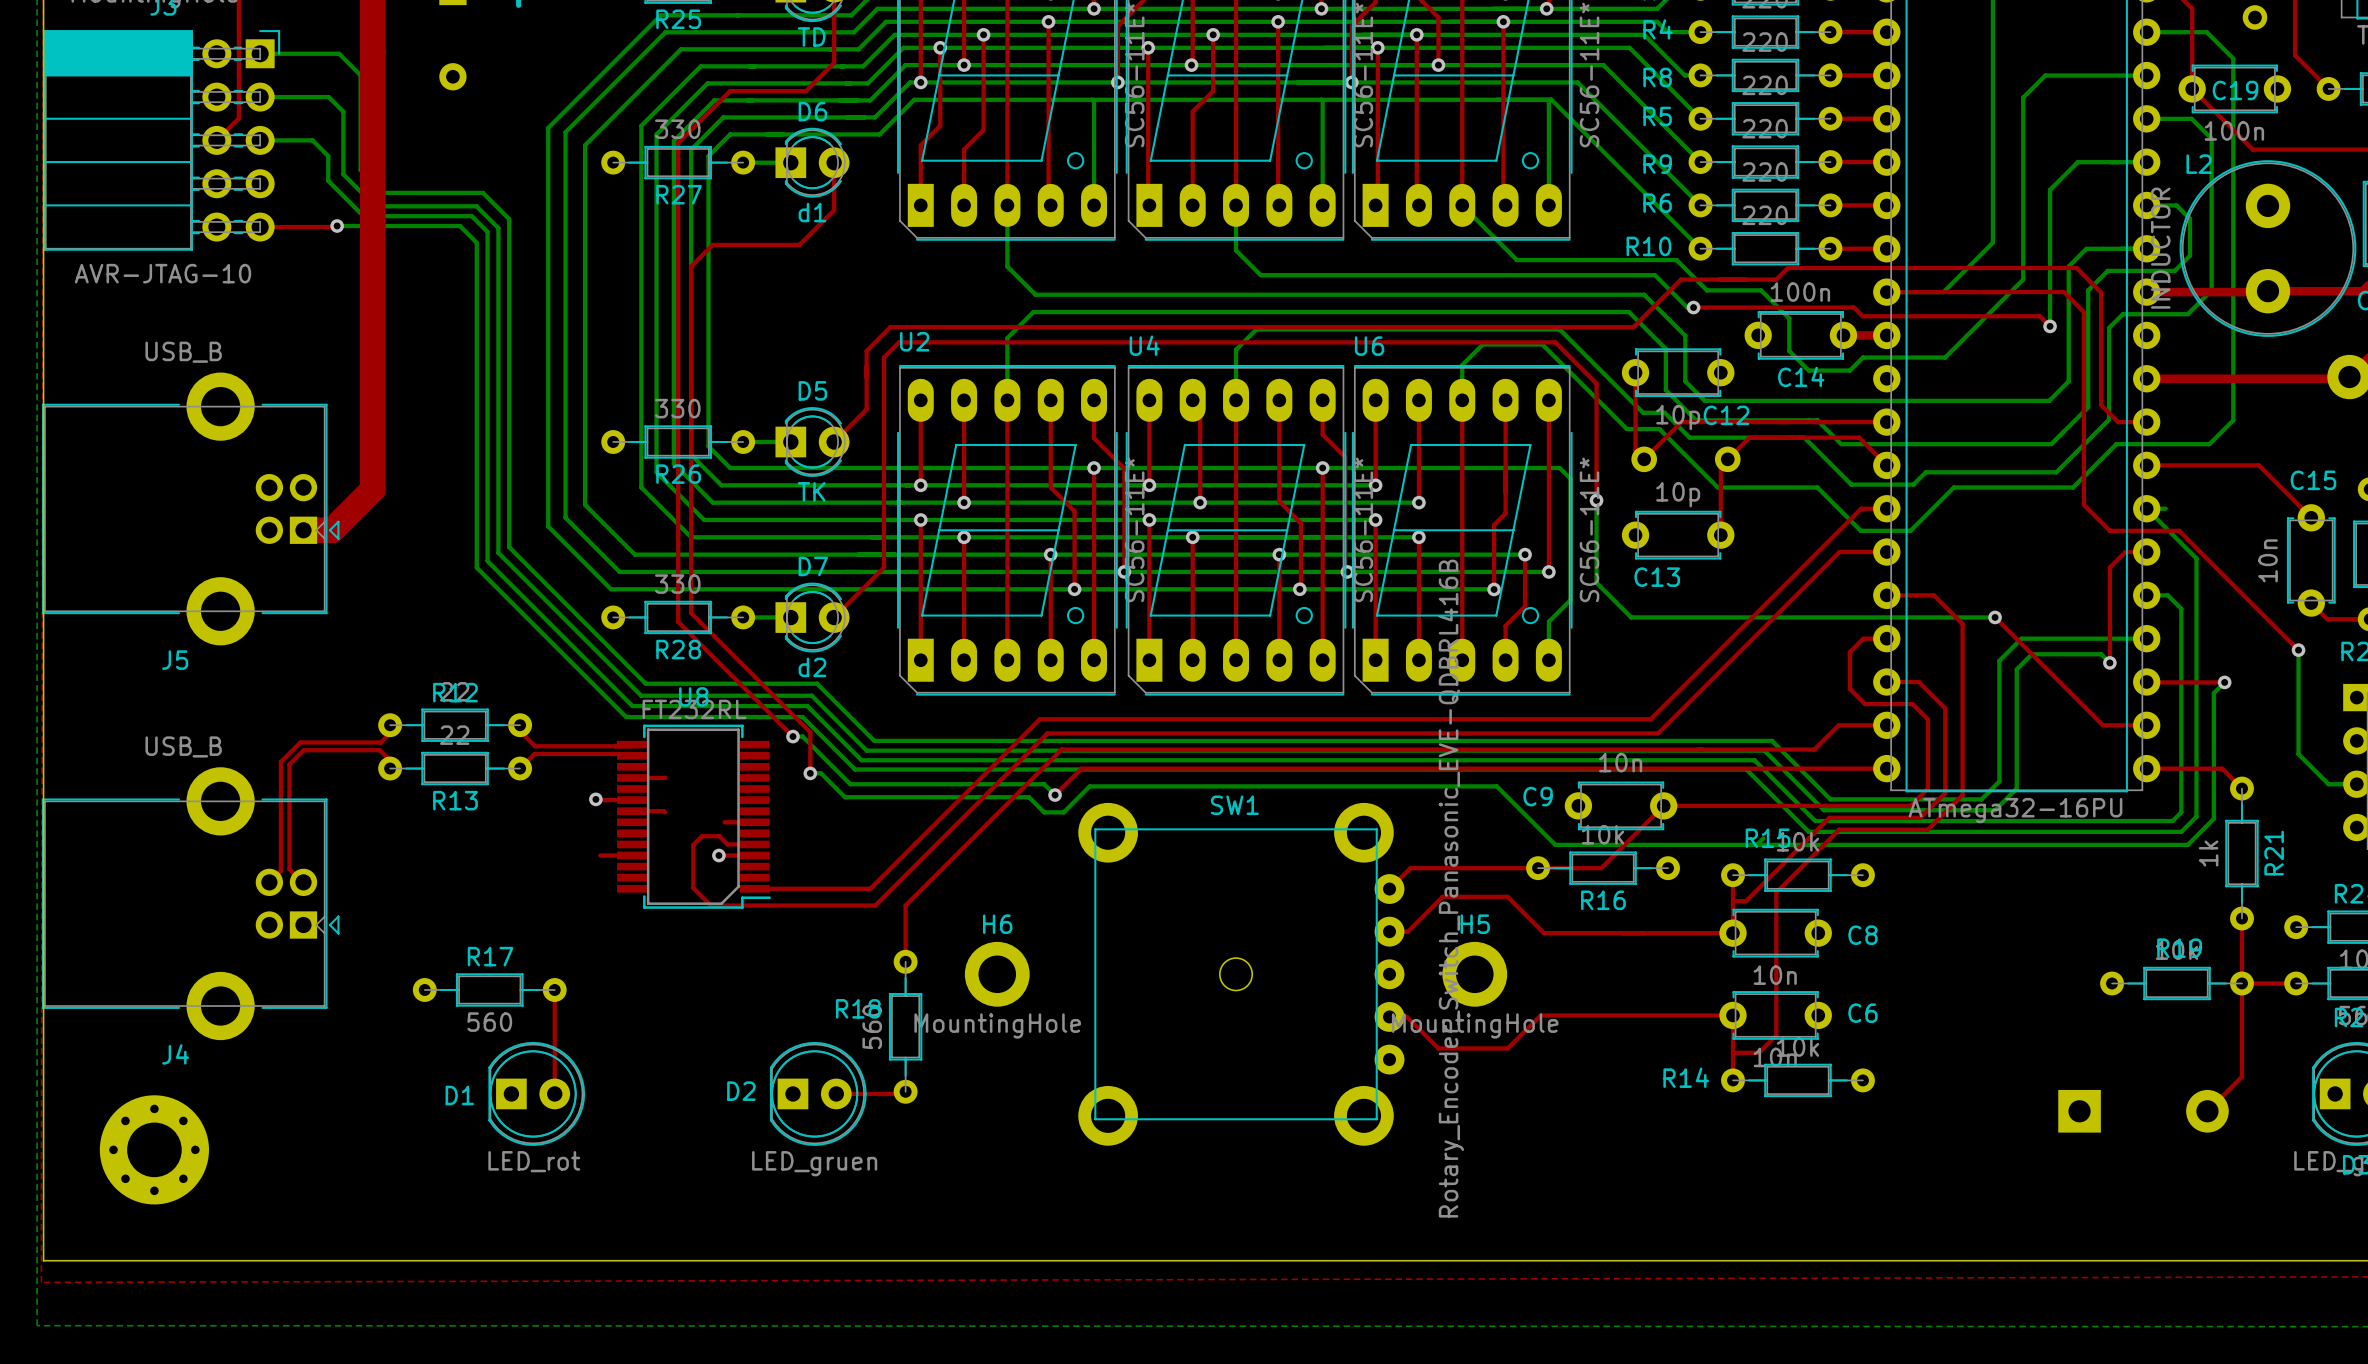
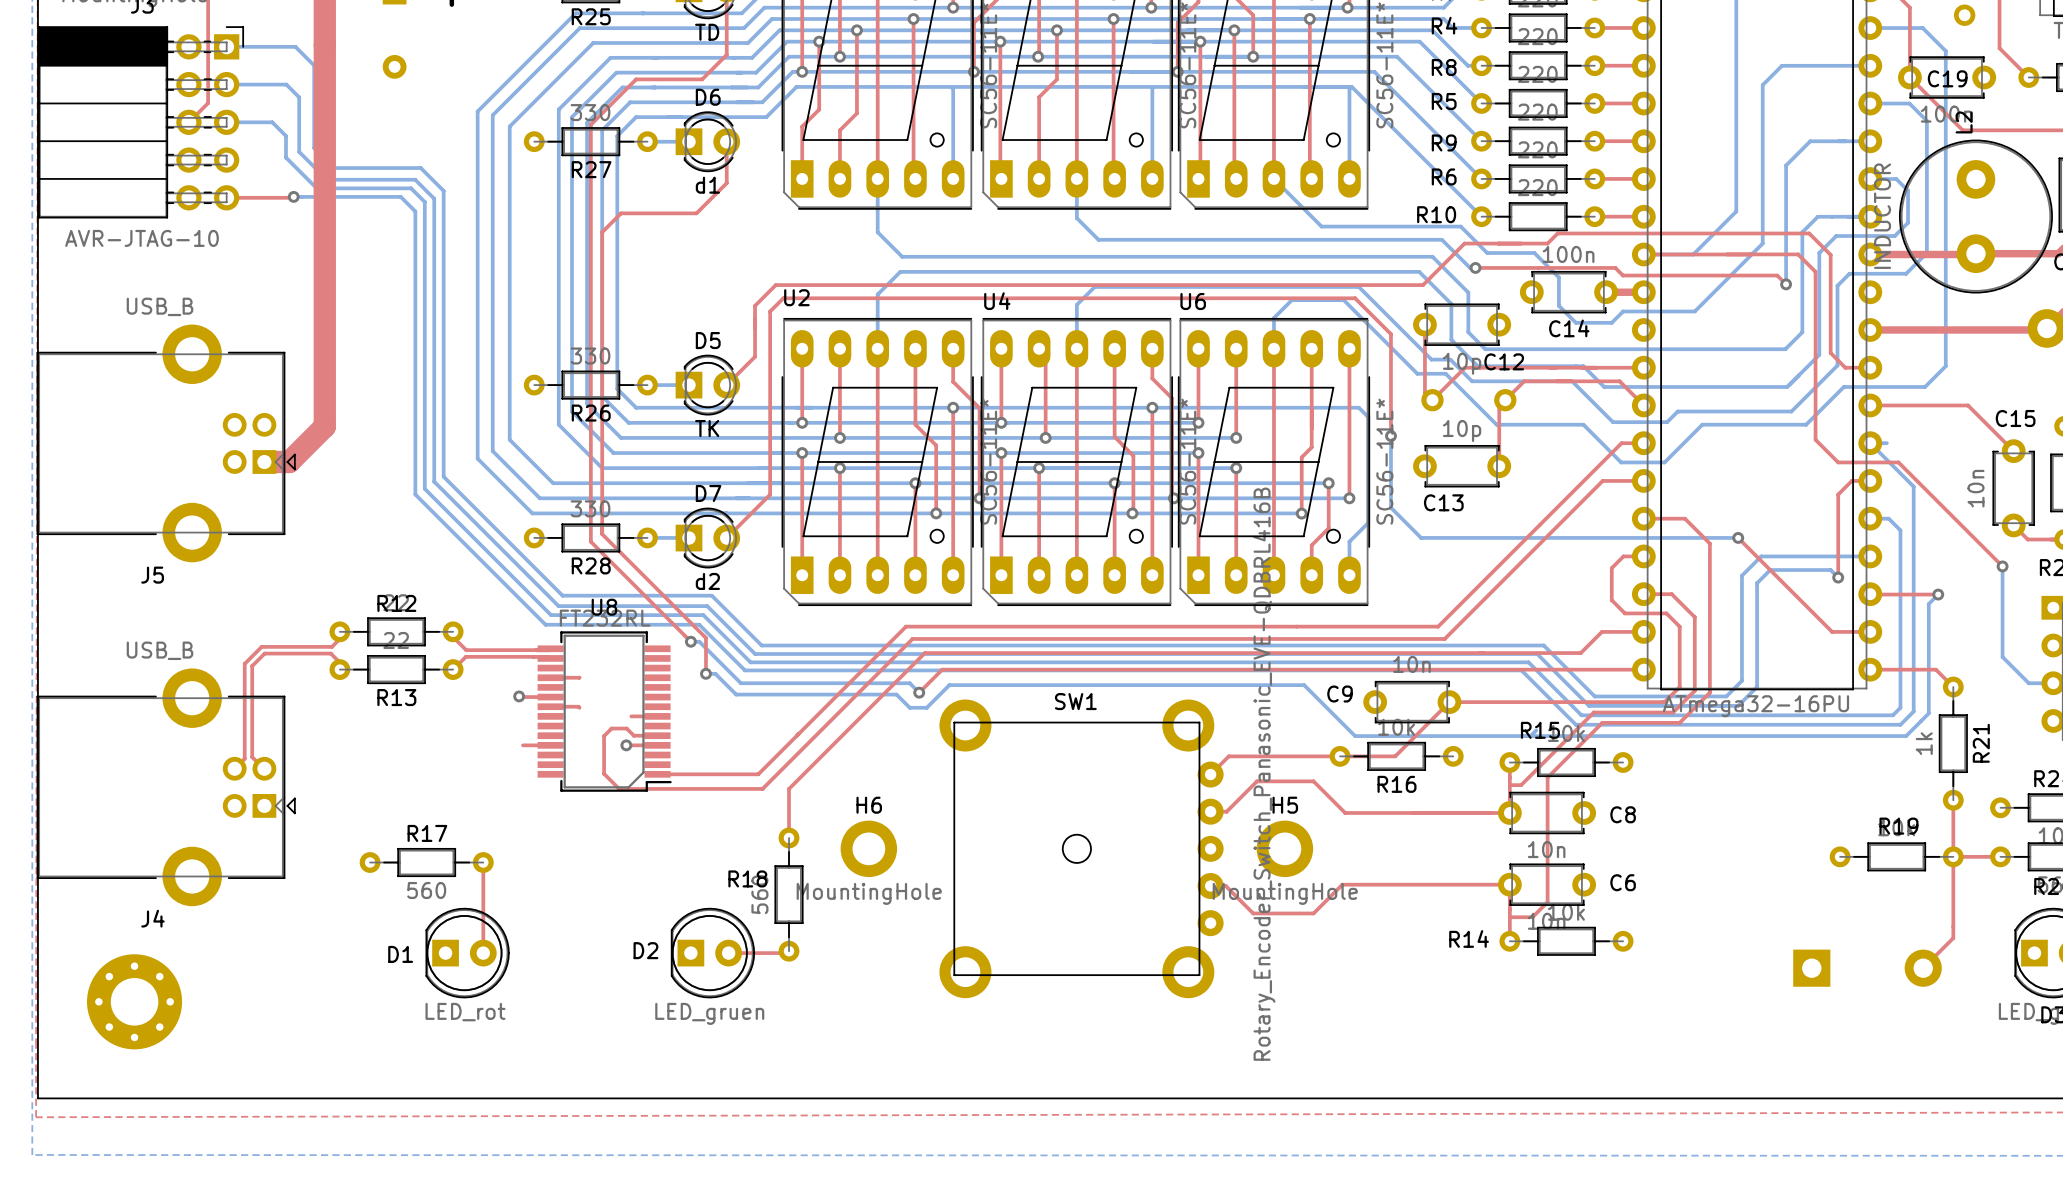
L2 name rotation: 0° (2199, 164) -> 90° counterclockwise (1964, 122)
L2 name position: L2 (2199, 164) -> L2 (1964, 122)

